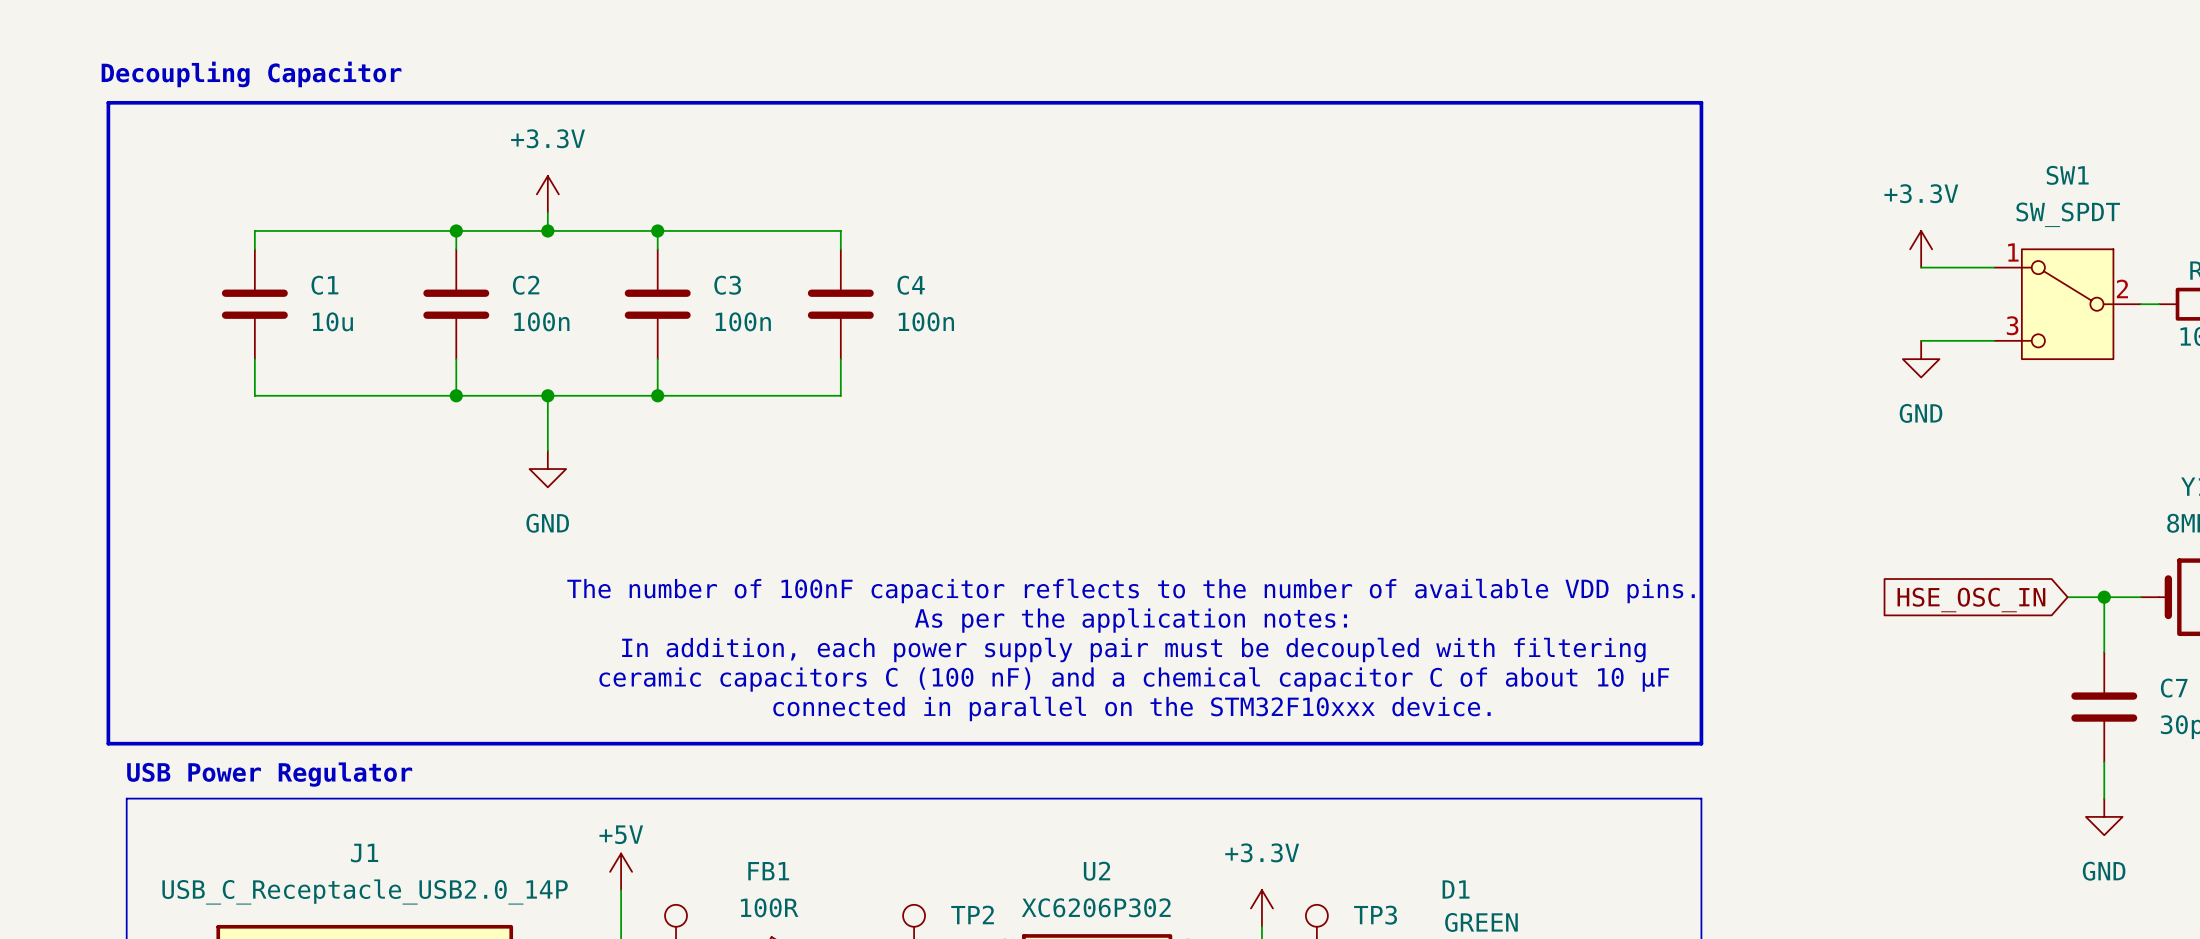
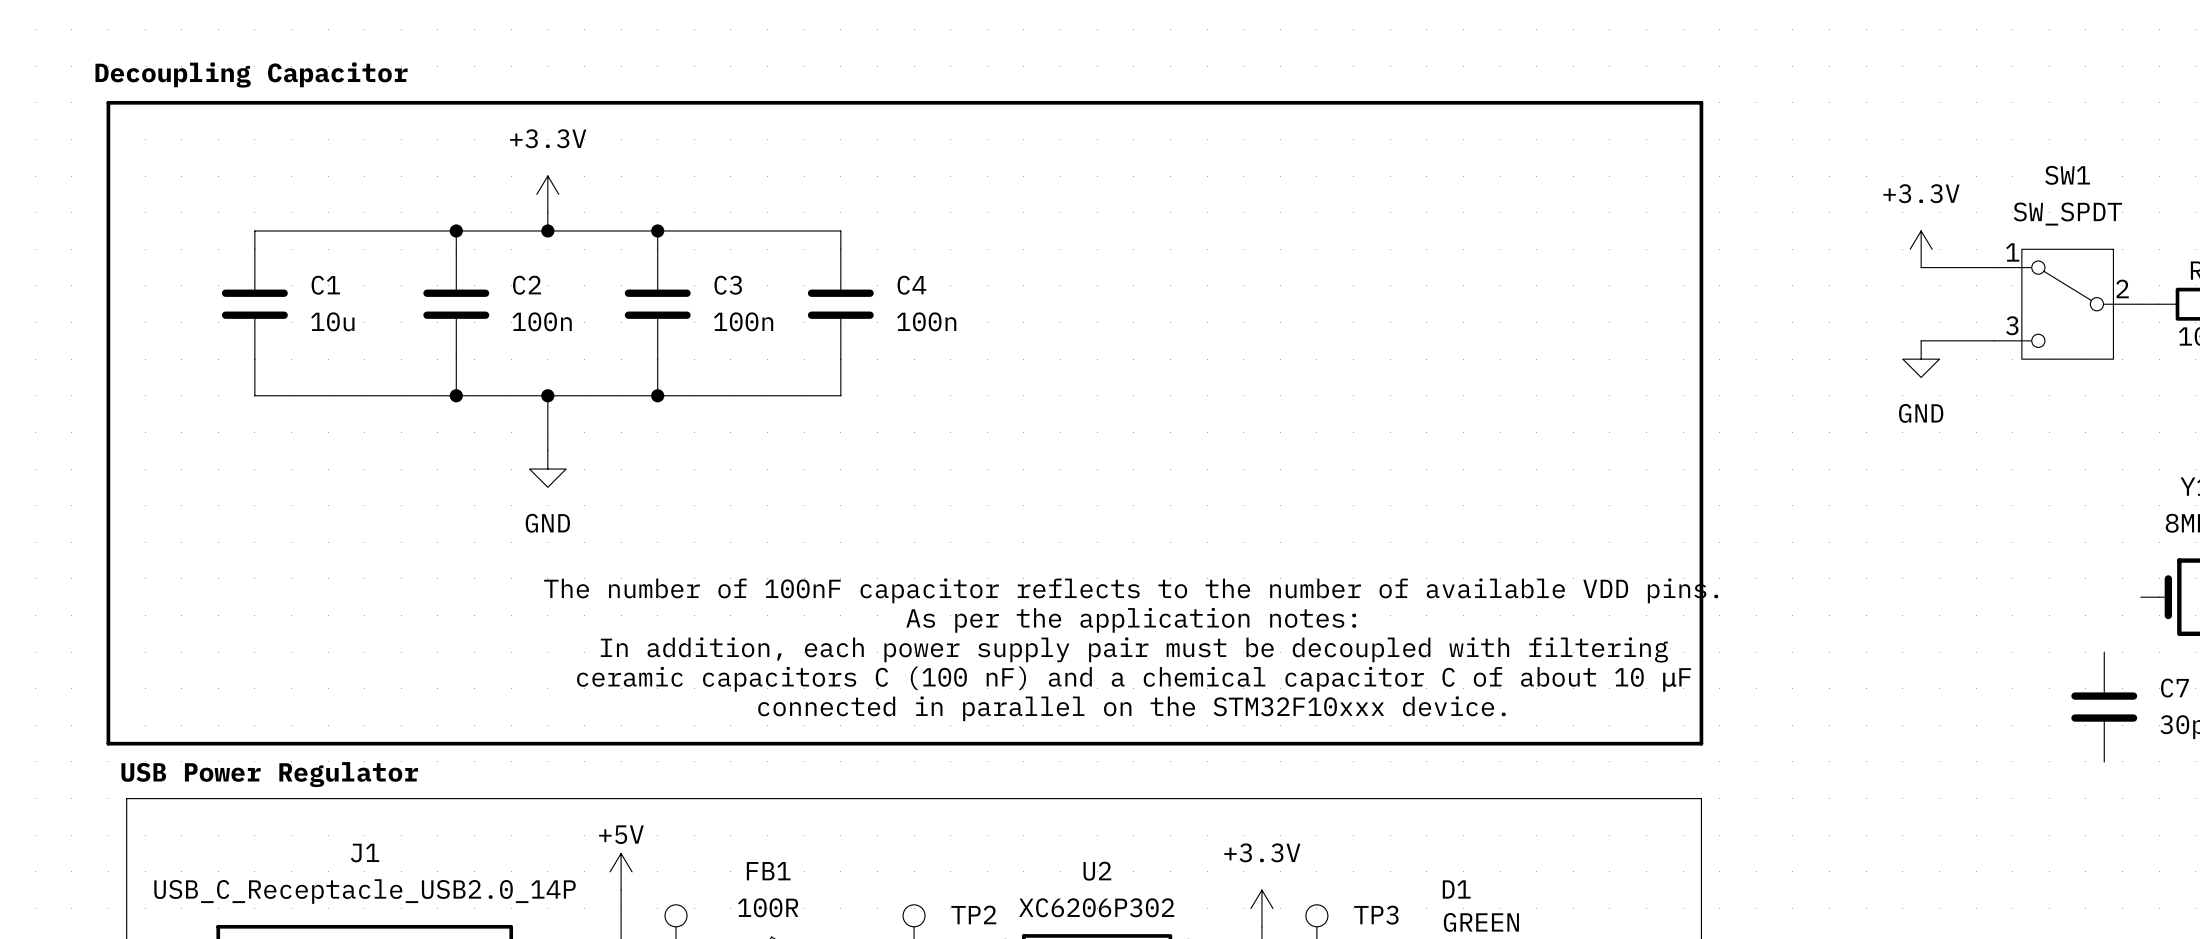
wire: (2067, 597) (2140, 597) -> none
wire: (2104, 597) (2104, 652) -> none
junction: (2104, 597) -> none
global label: HSE_OSC_IN (1971, 599) -> none
wire: (2104, 761) (2104, 798) -> none
power symbol: GND (2104, 816) -> none

